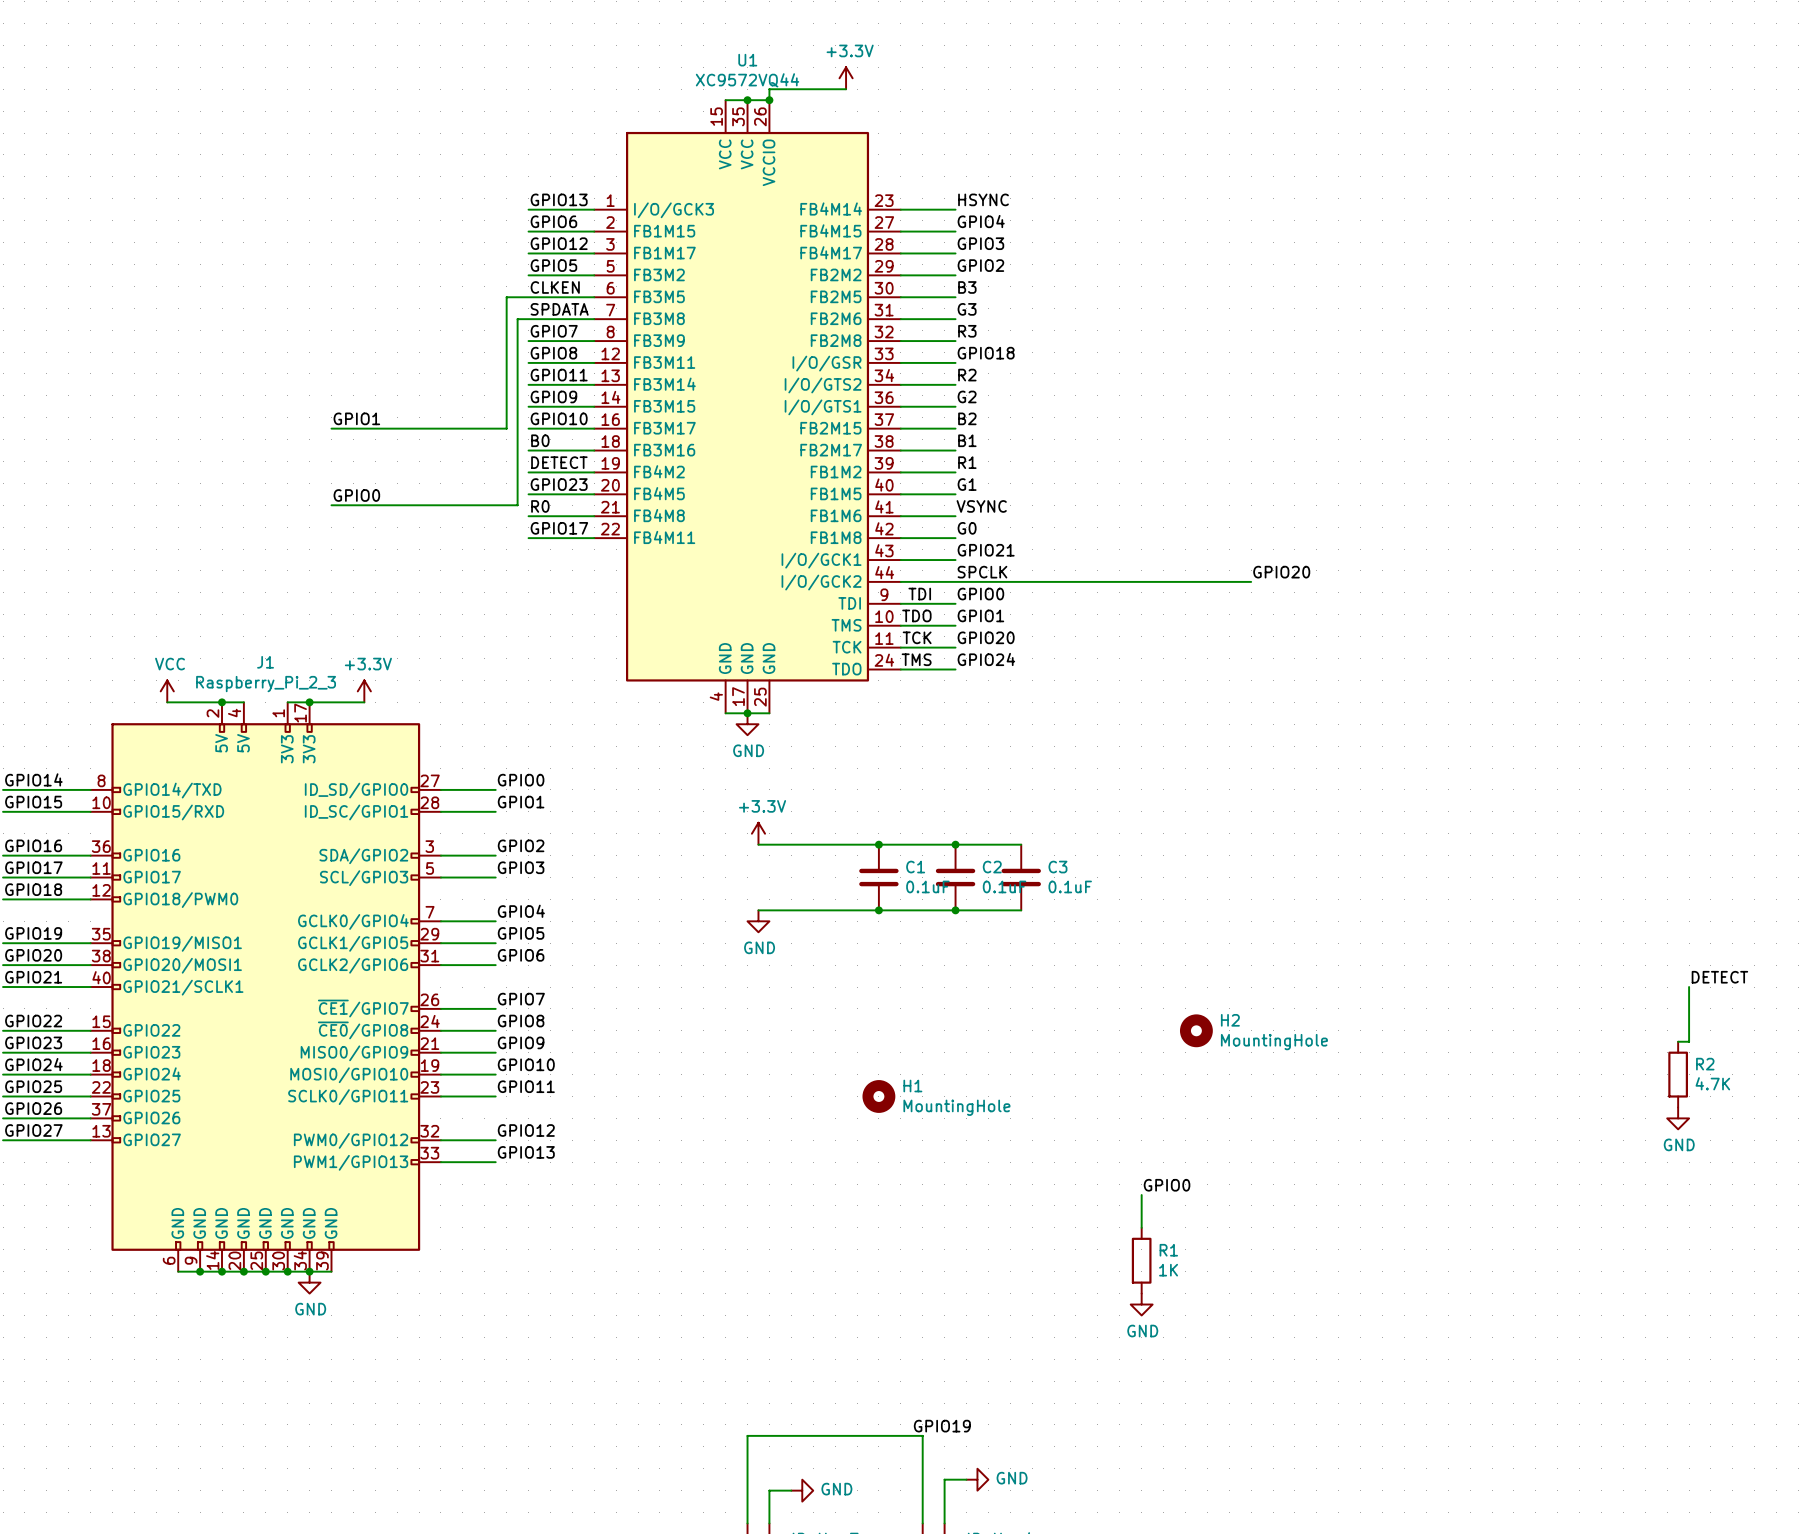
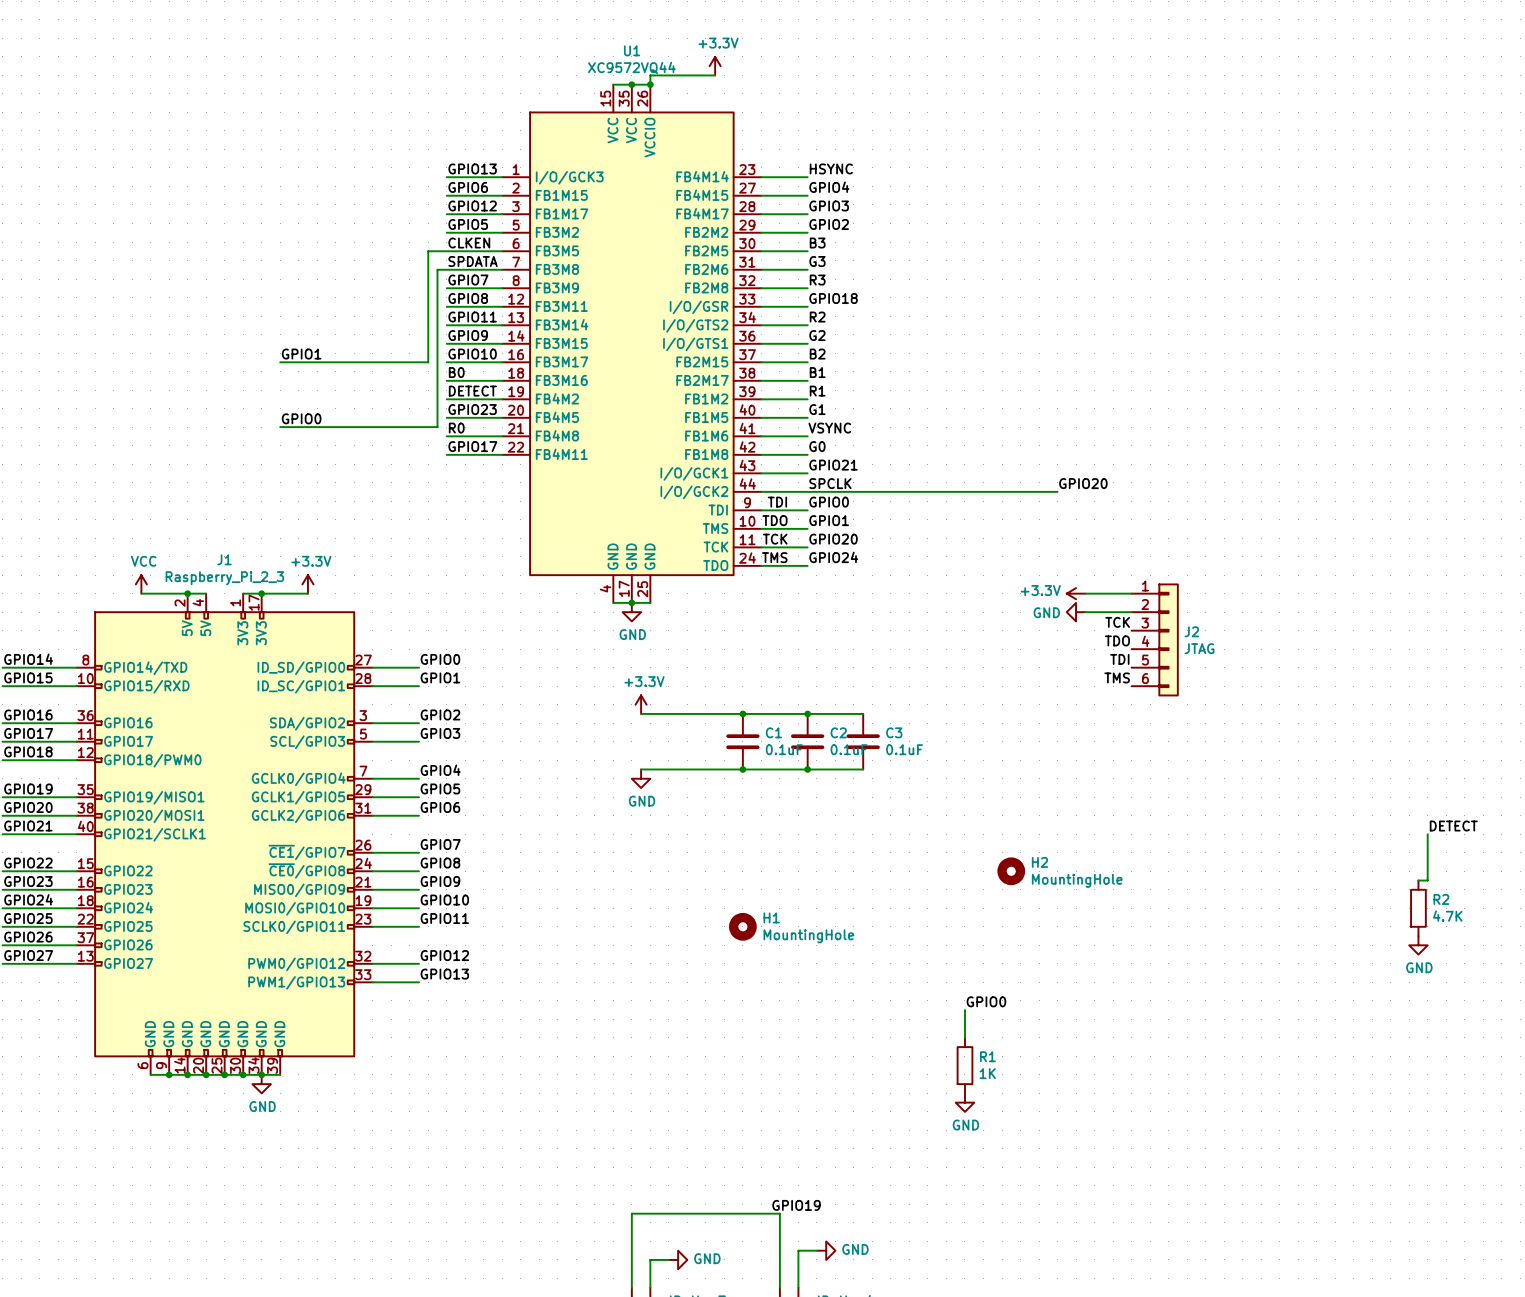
power symbol: none -> +3.3V (1076, 593)
wire: none -> (1085, 593) (1131, 593)
power symbol: none -> GND (1076, 612)
wire: none -> (1085, 612) (1131, 612)
label: none -> TCK (1117, 622)
J2: none -> JTAG (1155, 639)
label: none -> TDO (1117, 640)
label: none -> TDI (1119, 659)
label: none -> TMS (1117, 677)

